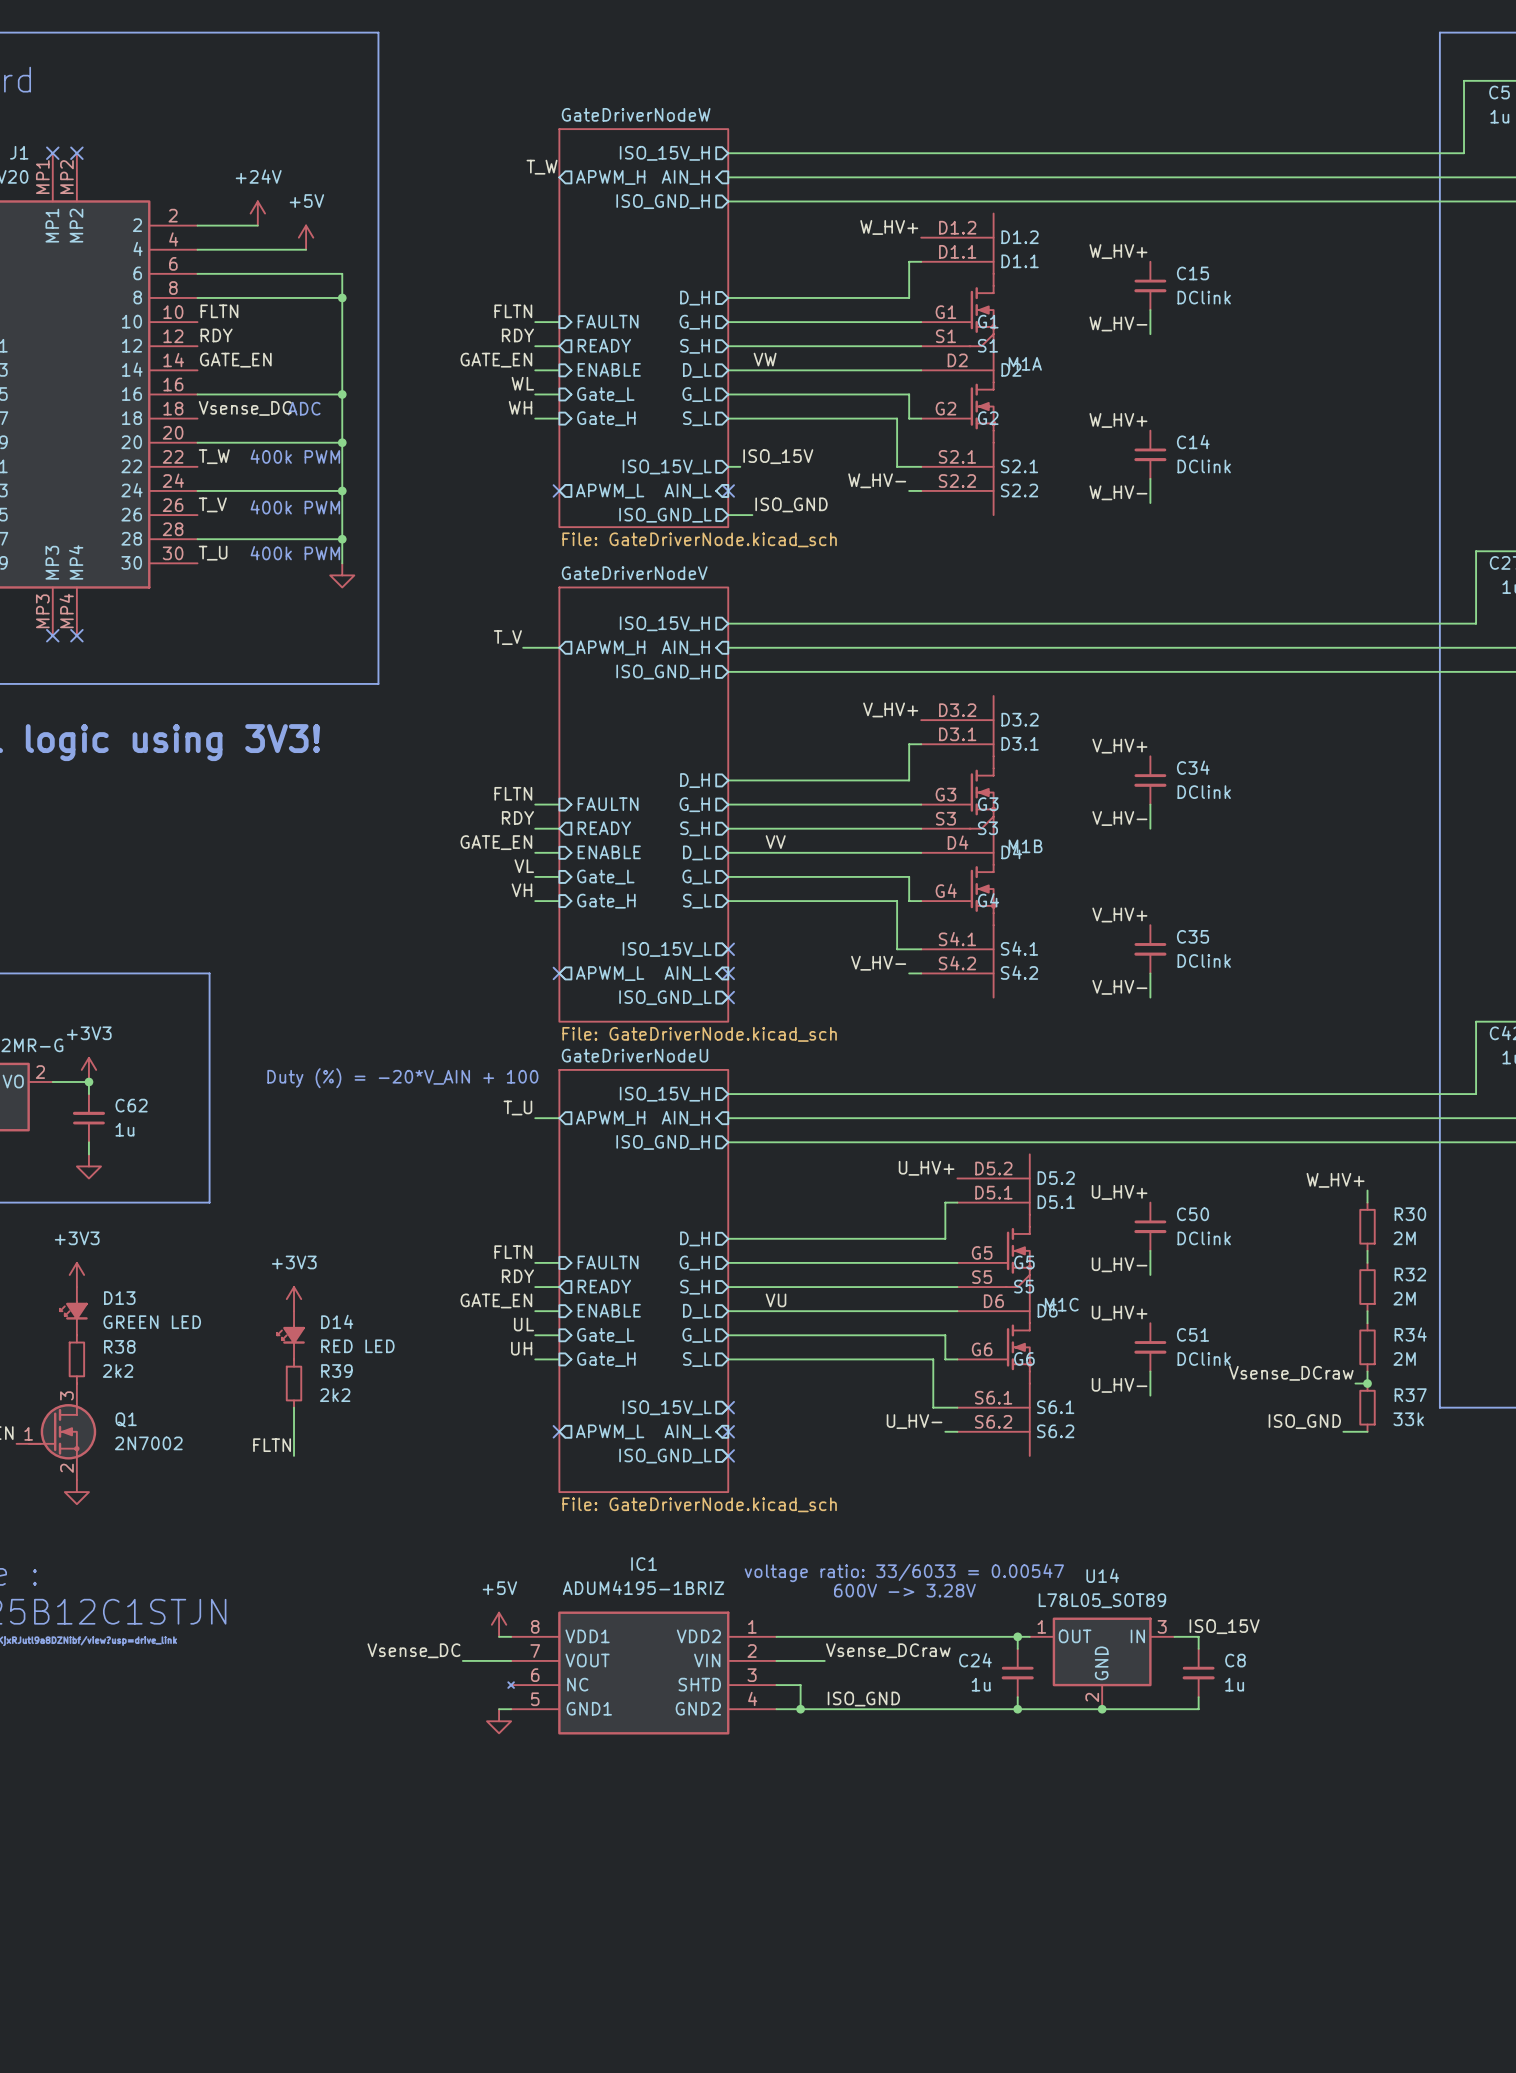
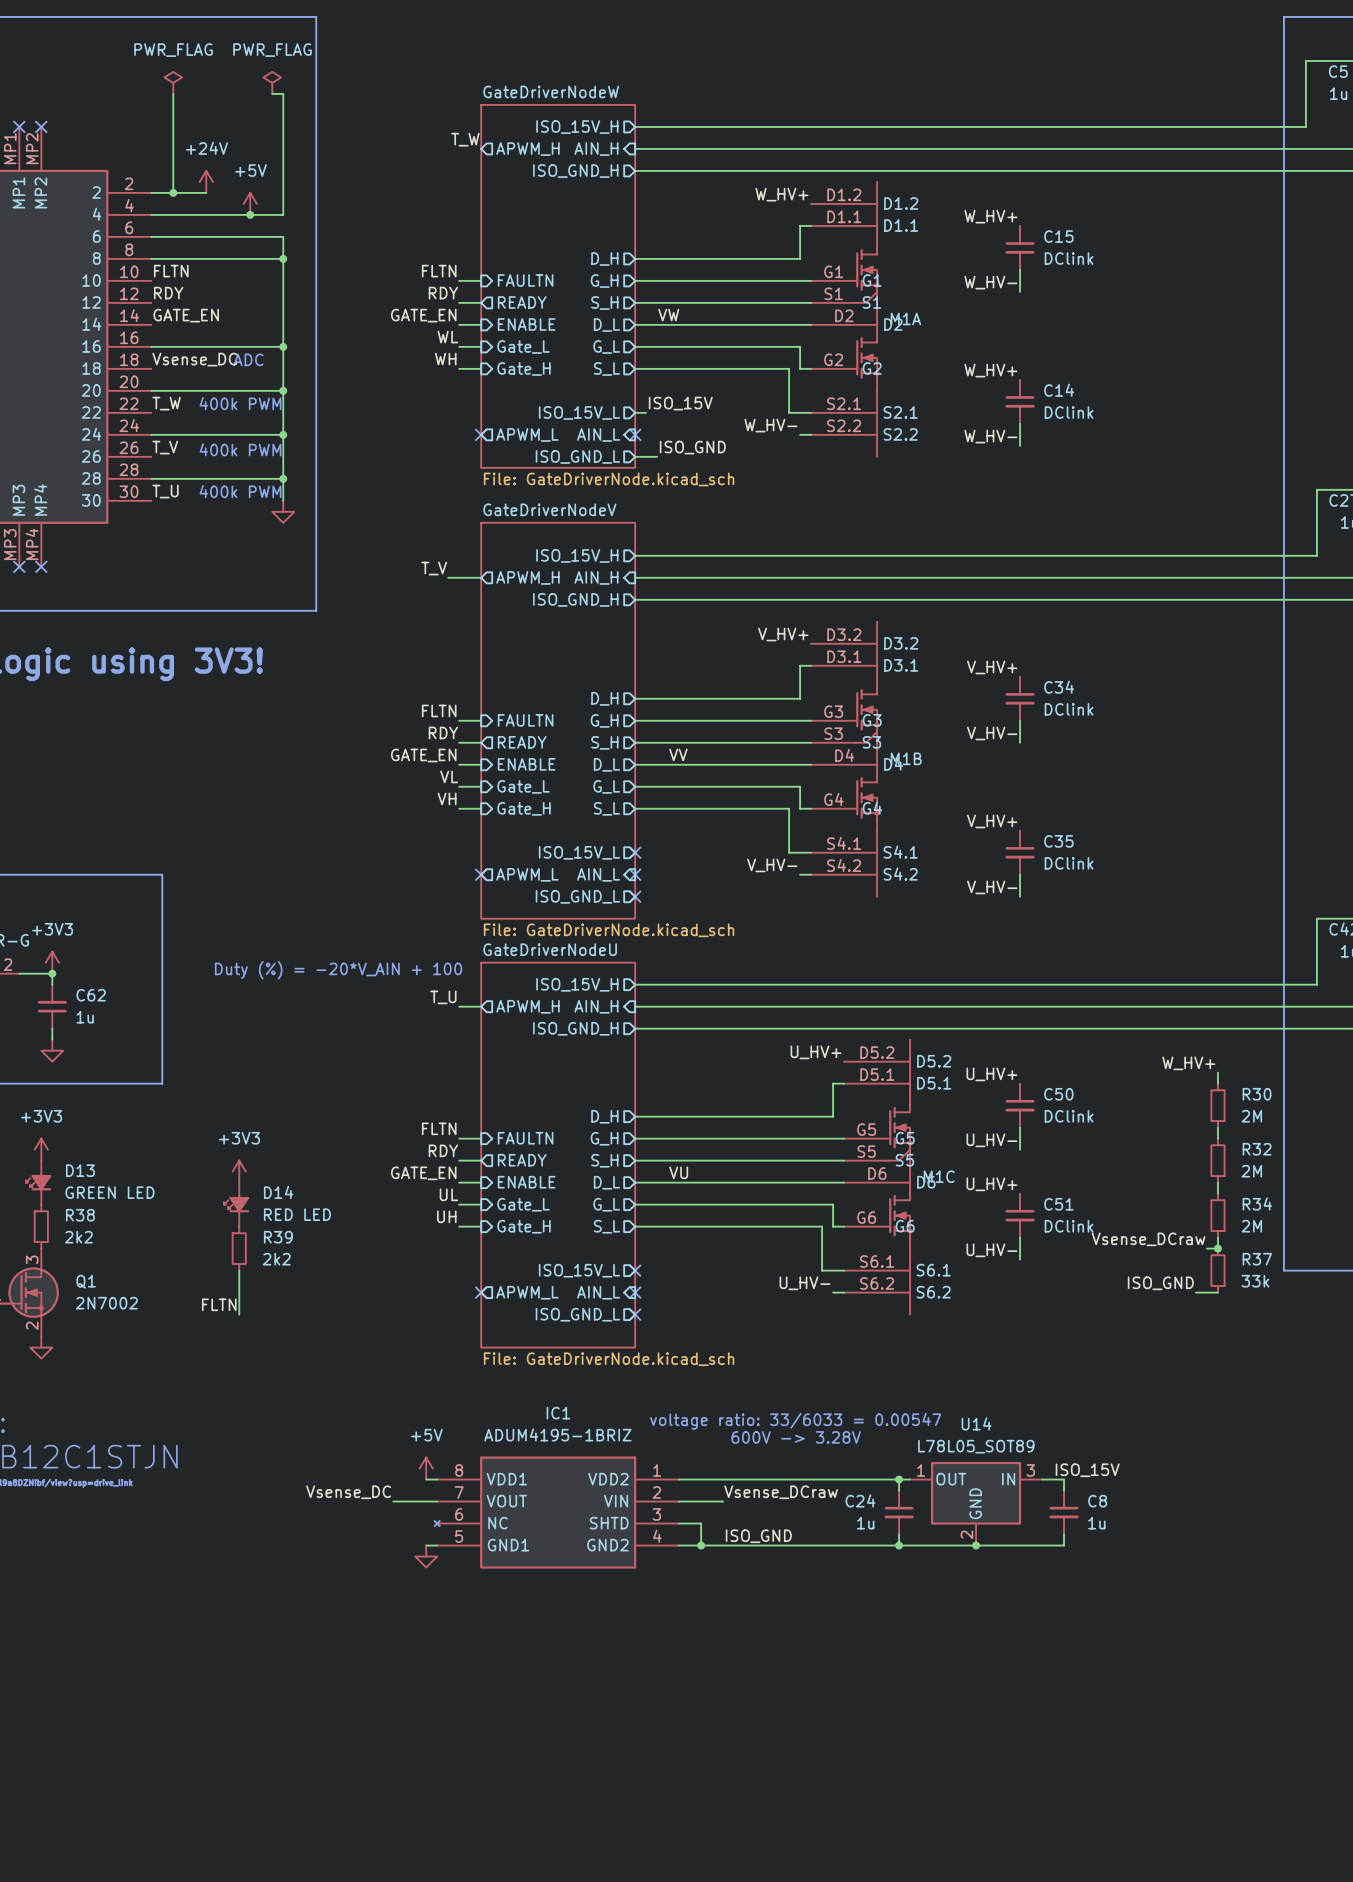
power symbol: none -> PWR_FLAG (173, 82)
power symbol: none -> PWR_FLAG (272, 82)
wire: none -> (173, 93) (173, 192)
wire: none -> (272, 93) (283, 93) (283, 214) (250, 214)
junction: none -> (173, 192)
junction: none -> (250, 214)

